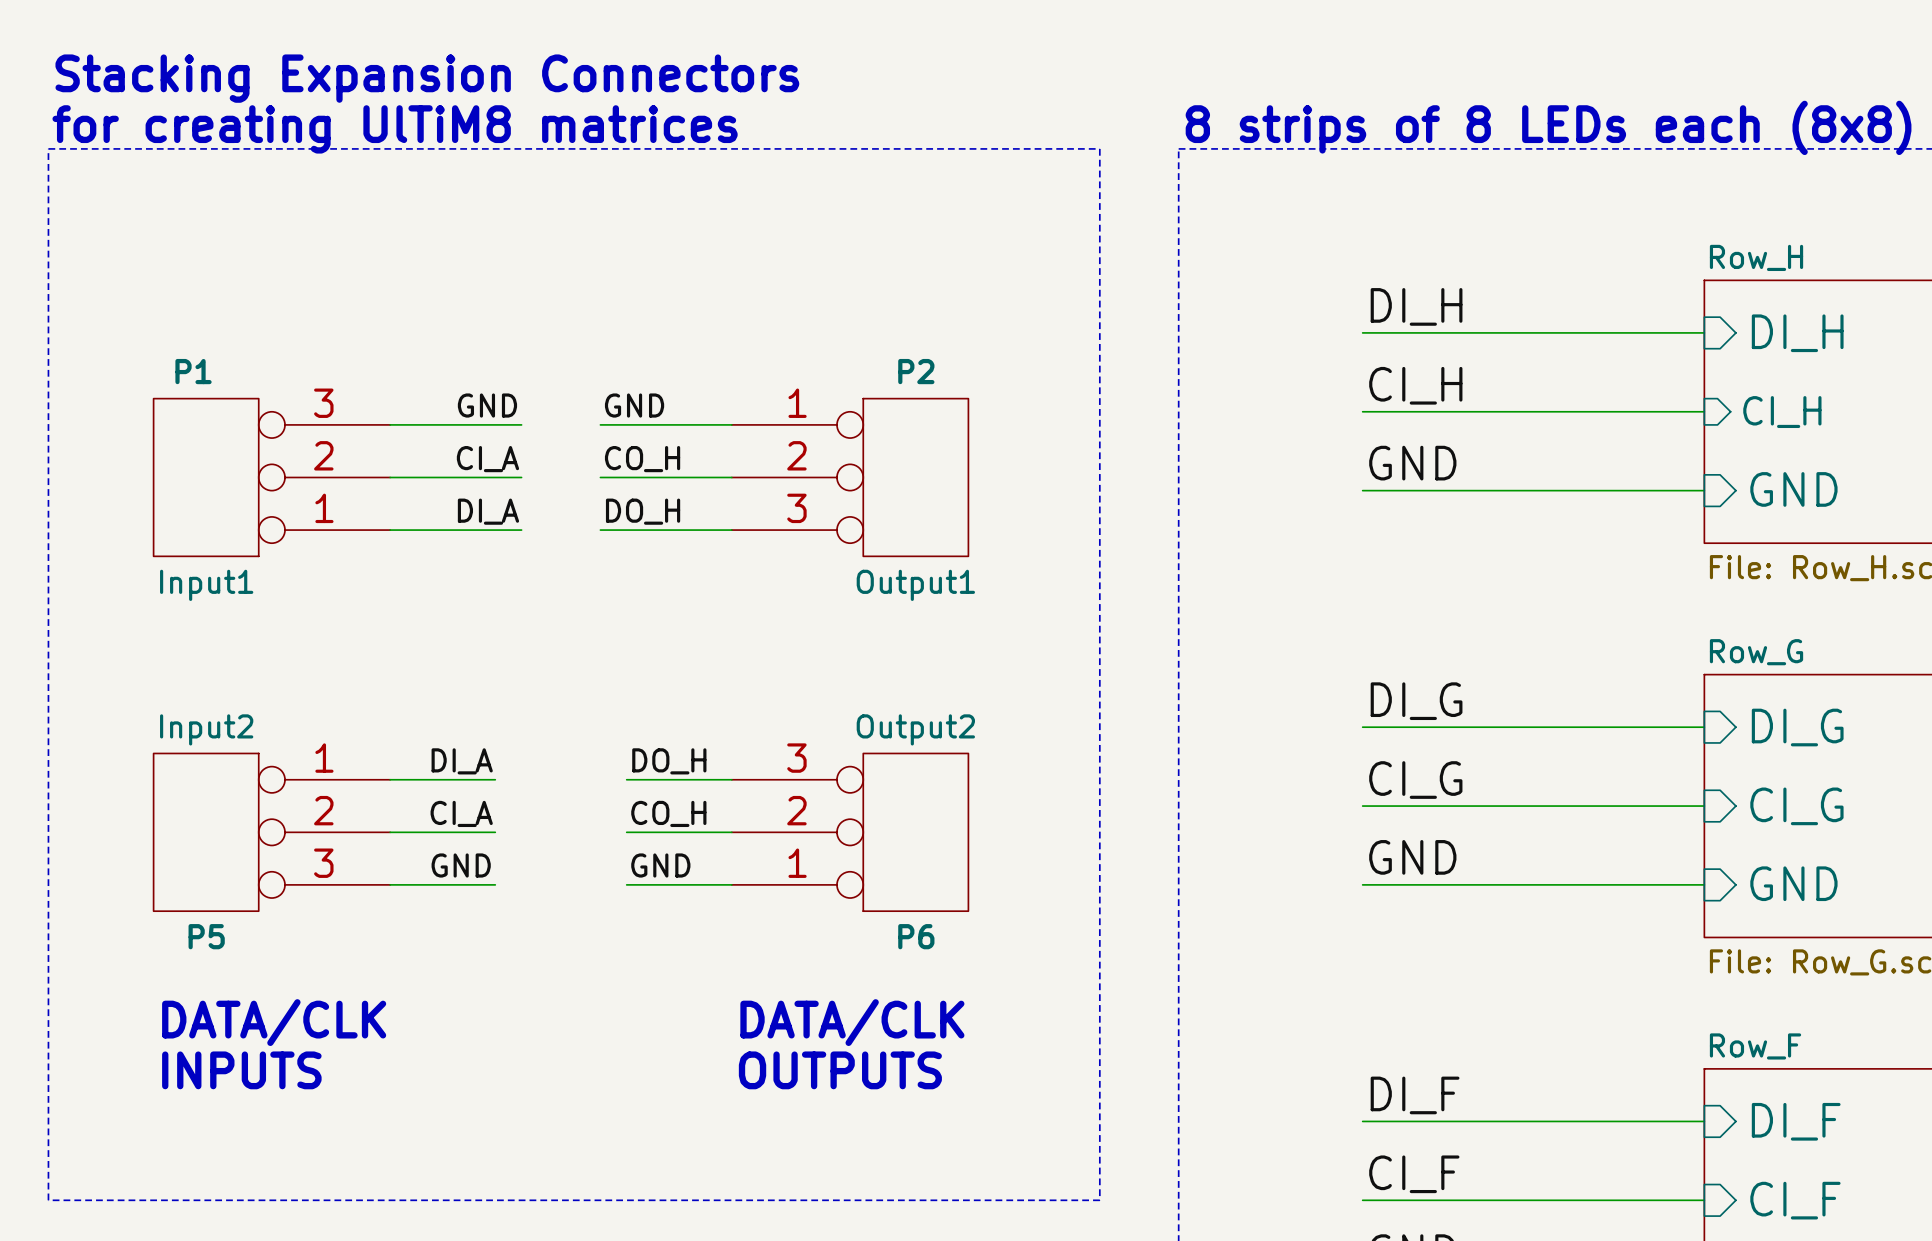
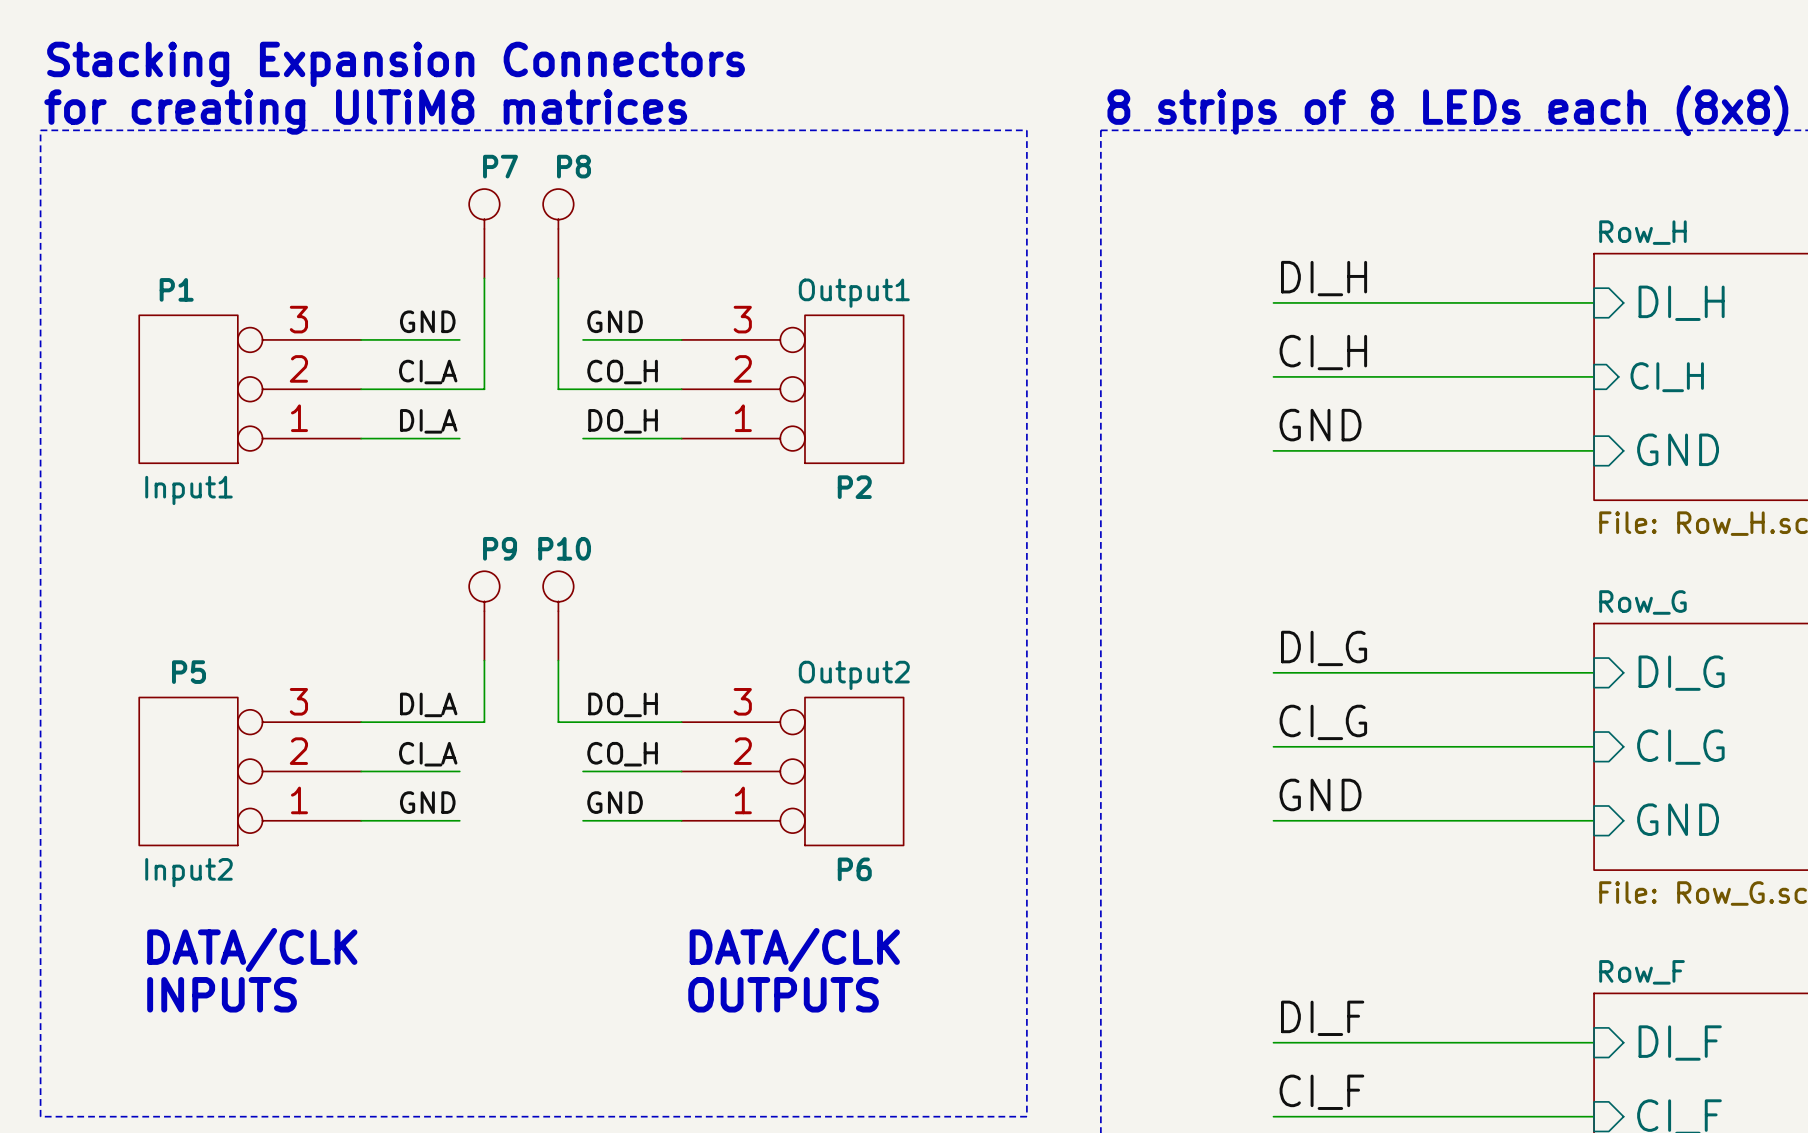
P7: none -> (484, 233)
P8: none -> (558, 233)
wire: none -> (484, 278) (484, 389)
wire: none -> (558, 278) (558, 389)
label: none -> GND (427, 321)
label: none -> GND (615, 321)
wire: none -> (361, 339) (459, 339)
wire: none -> (583, 339) (681, 339)
label: GND (487, 405) -> none
label: GND (634, 405) -> none
label position: CI_A (487, 459) -> CI_A (428, 372)
label position: CO_H (642, 459) -> CO_H (622, 372)
P1 position: (271, 477) -> (250, 389)
wire: (495, 477) (521, 477) -> none
wire: (600, 477) (626, 477) -> none
P2 flip: as is (915, 477) -> up-down (854, 389)
label position: DI_A (488, 511) -> DI_A (428, 421)
label position: DO_H (643, 511) -> DO_H (623, 421)
wire: (390, 530) (521, 530) -> none
wire: (600, 530) (731, 530) -> none
P9: none -> (484, 615)
P10: none -> (558, 615)
wire: none -> (484, 660) (484, 722) (459, 722)
wire: none -> (558, 660) (558, 722) (583, 722)
P5 flip: as is (206, 832) -> up-down (188, 771)

